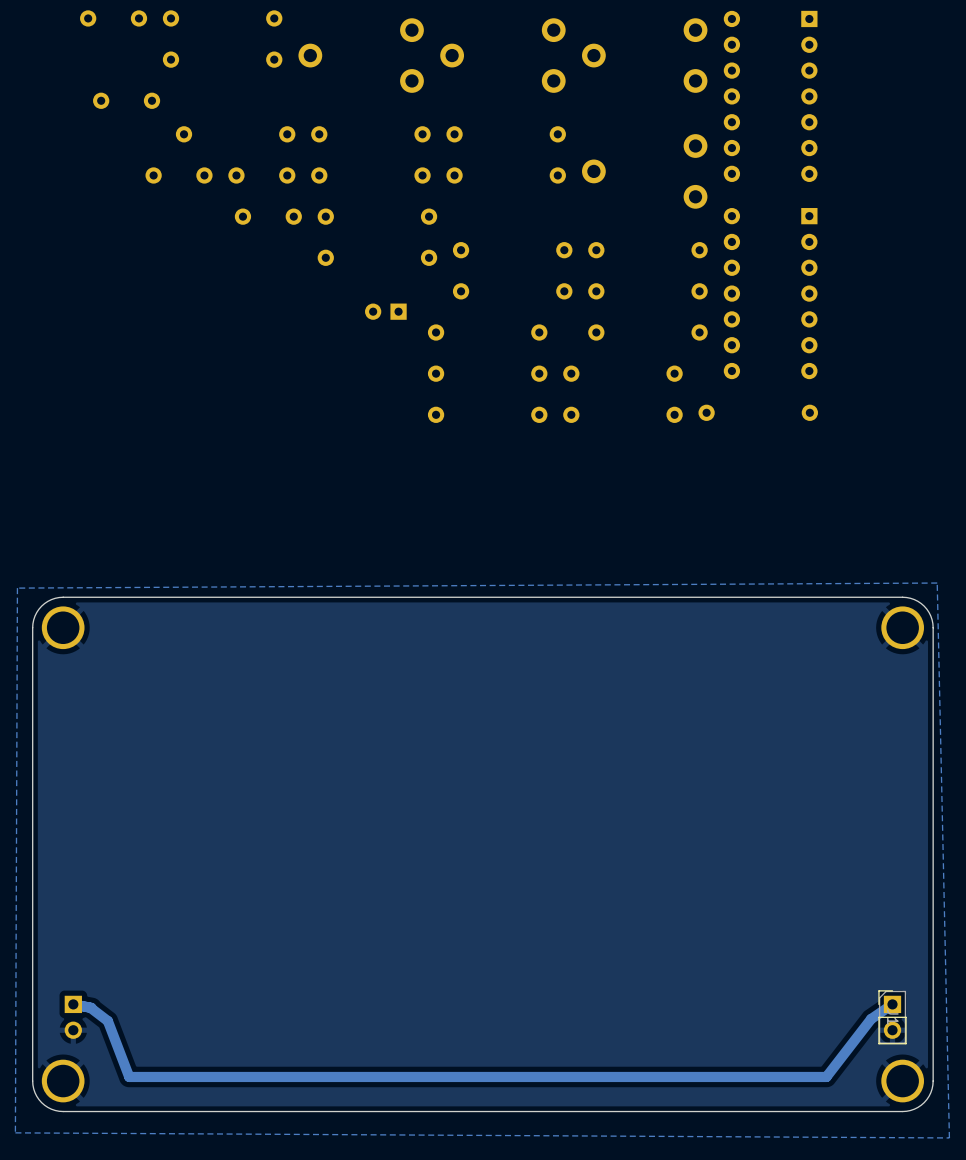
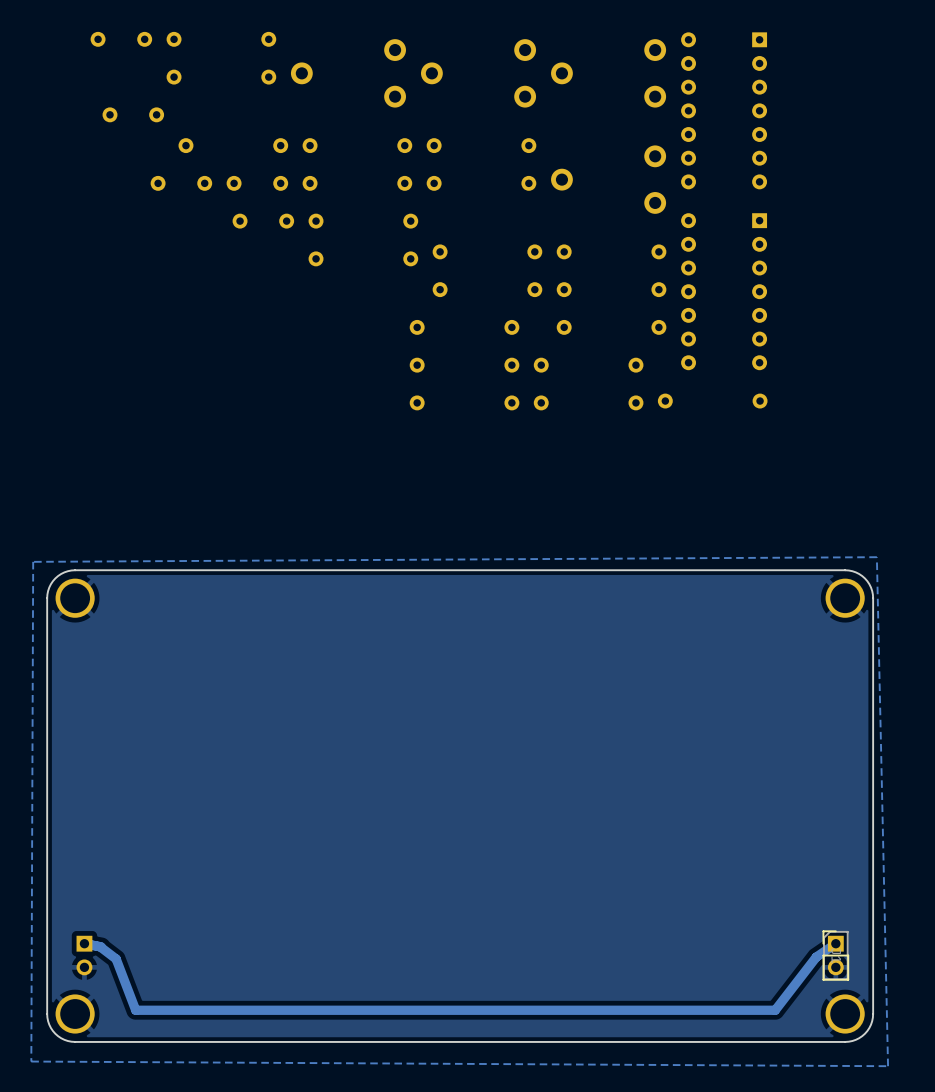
part: (385, 311) -> none

